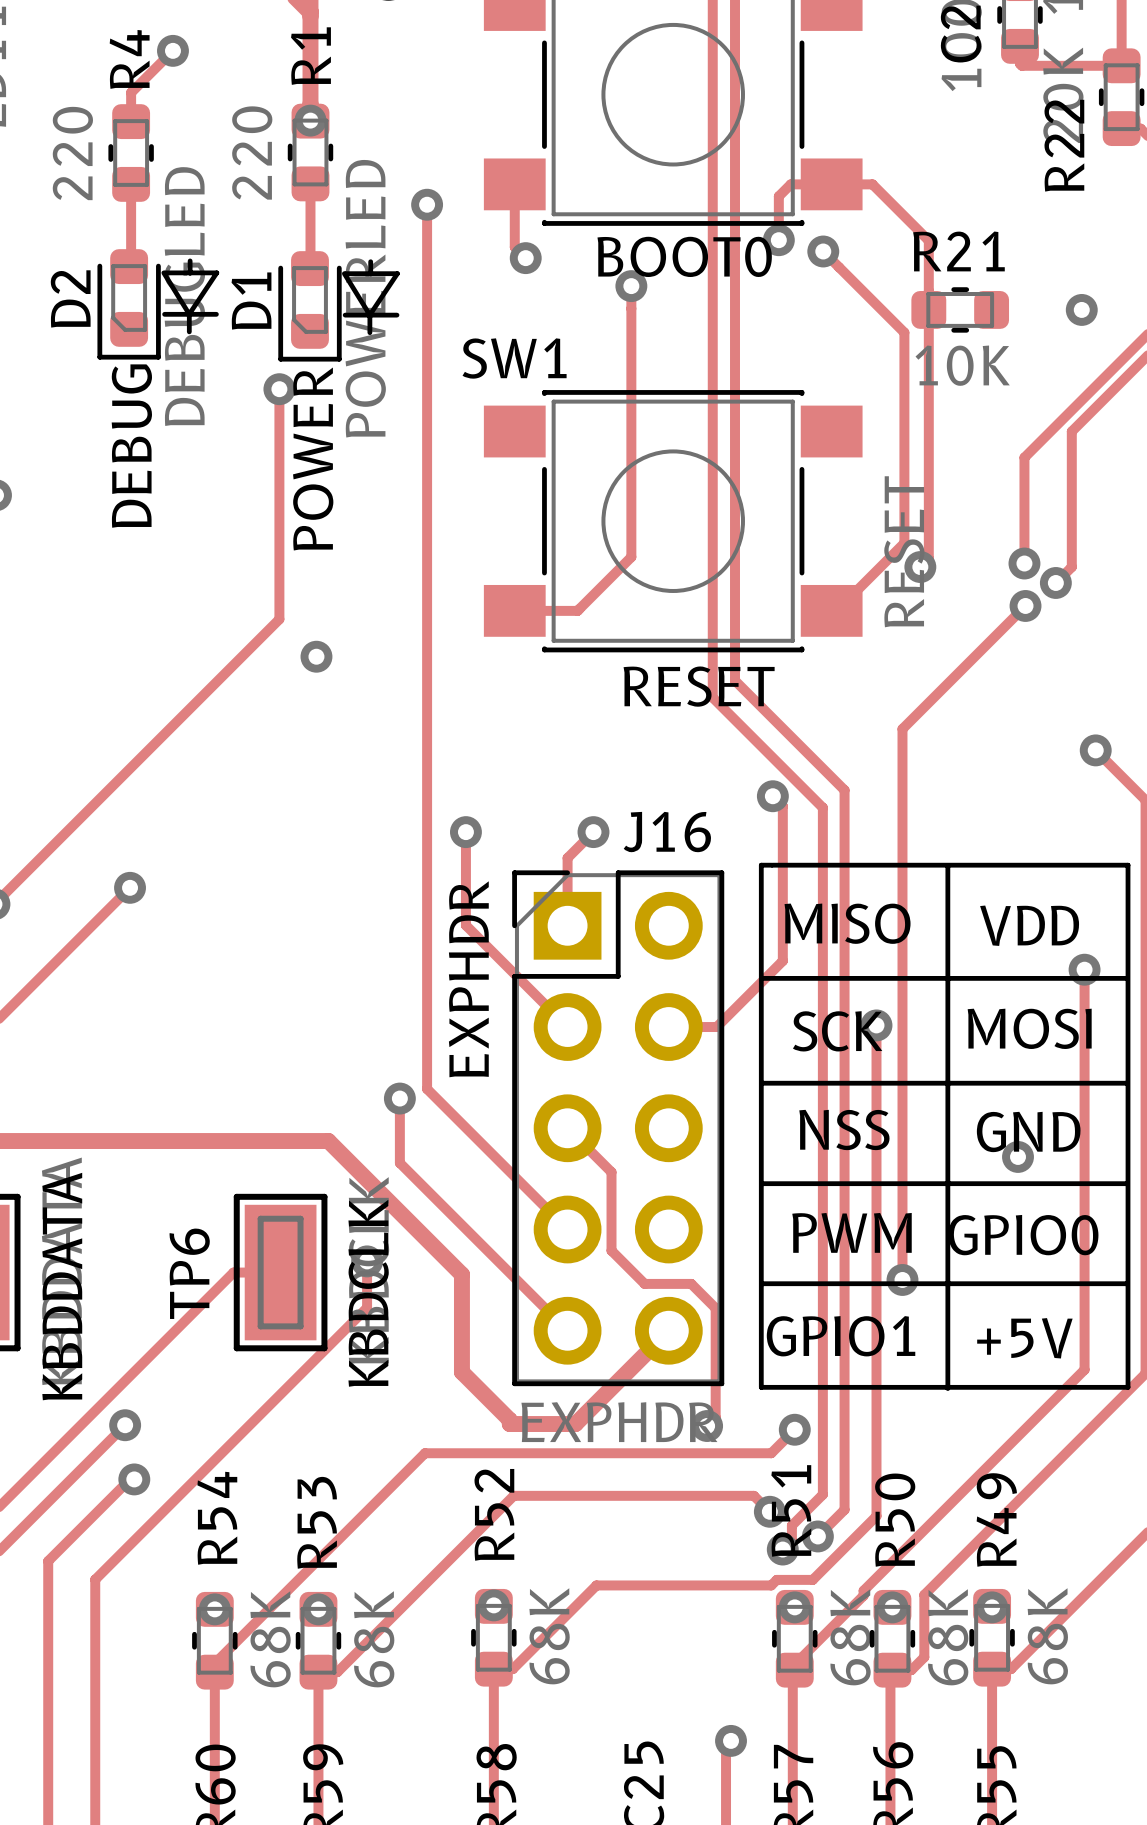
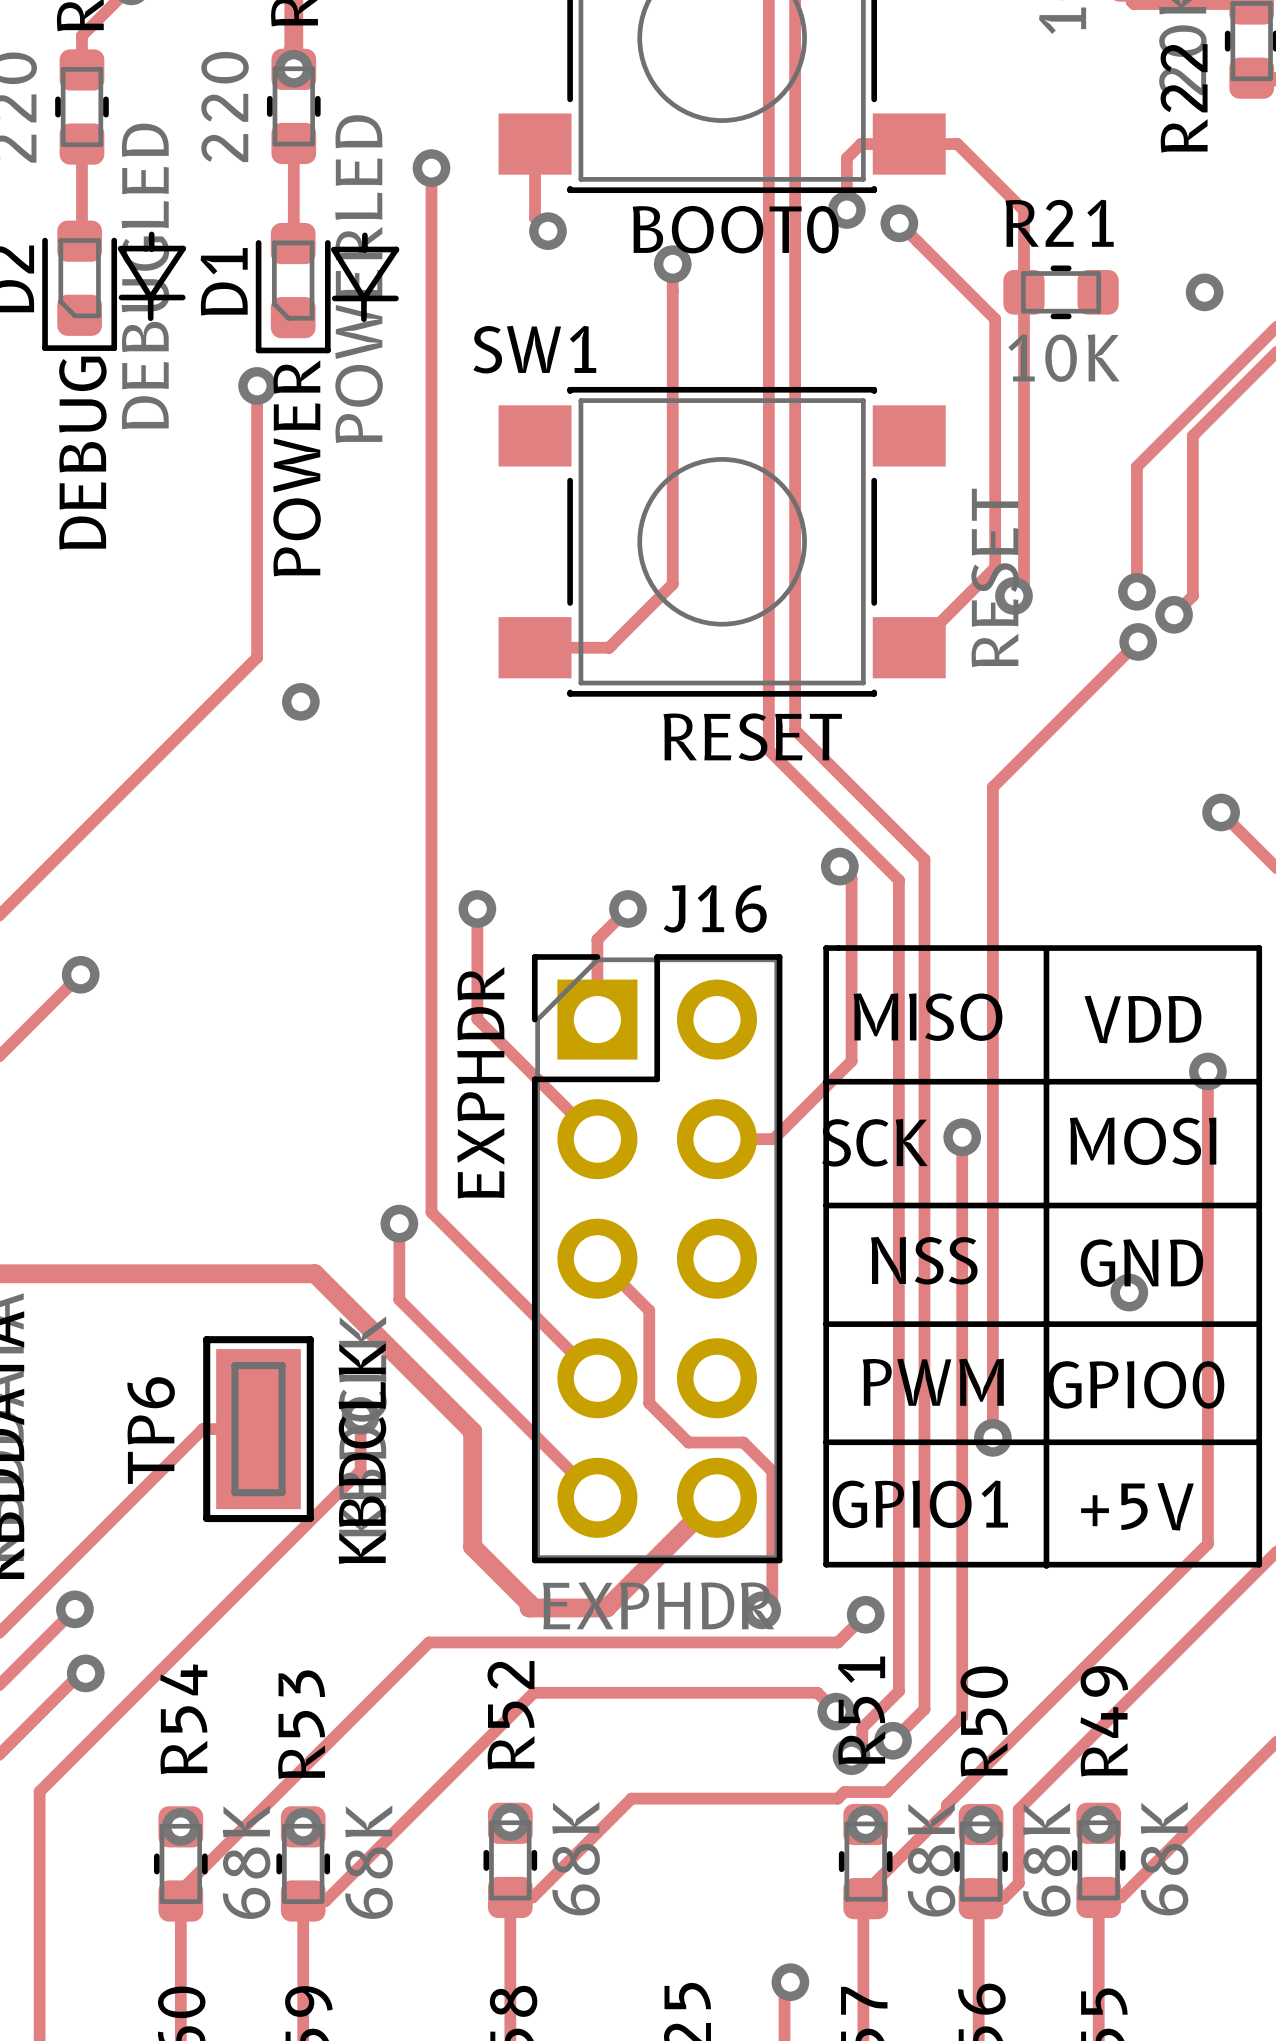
text position: SCK (837, 1031) -> SCK (874, 1142)

